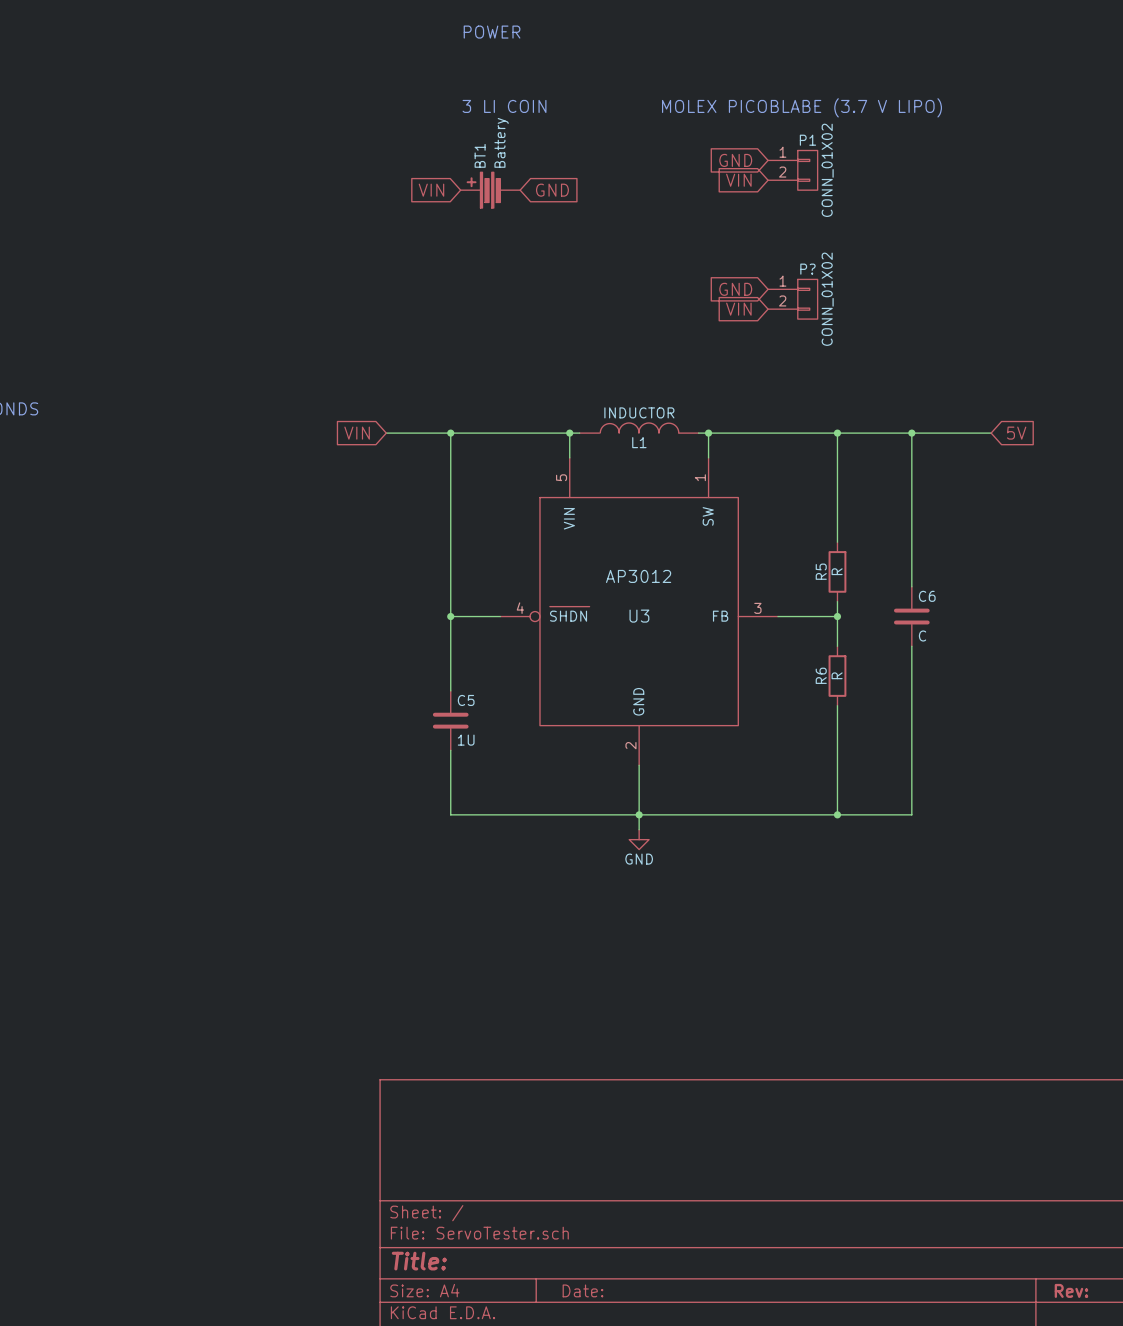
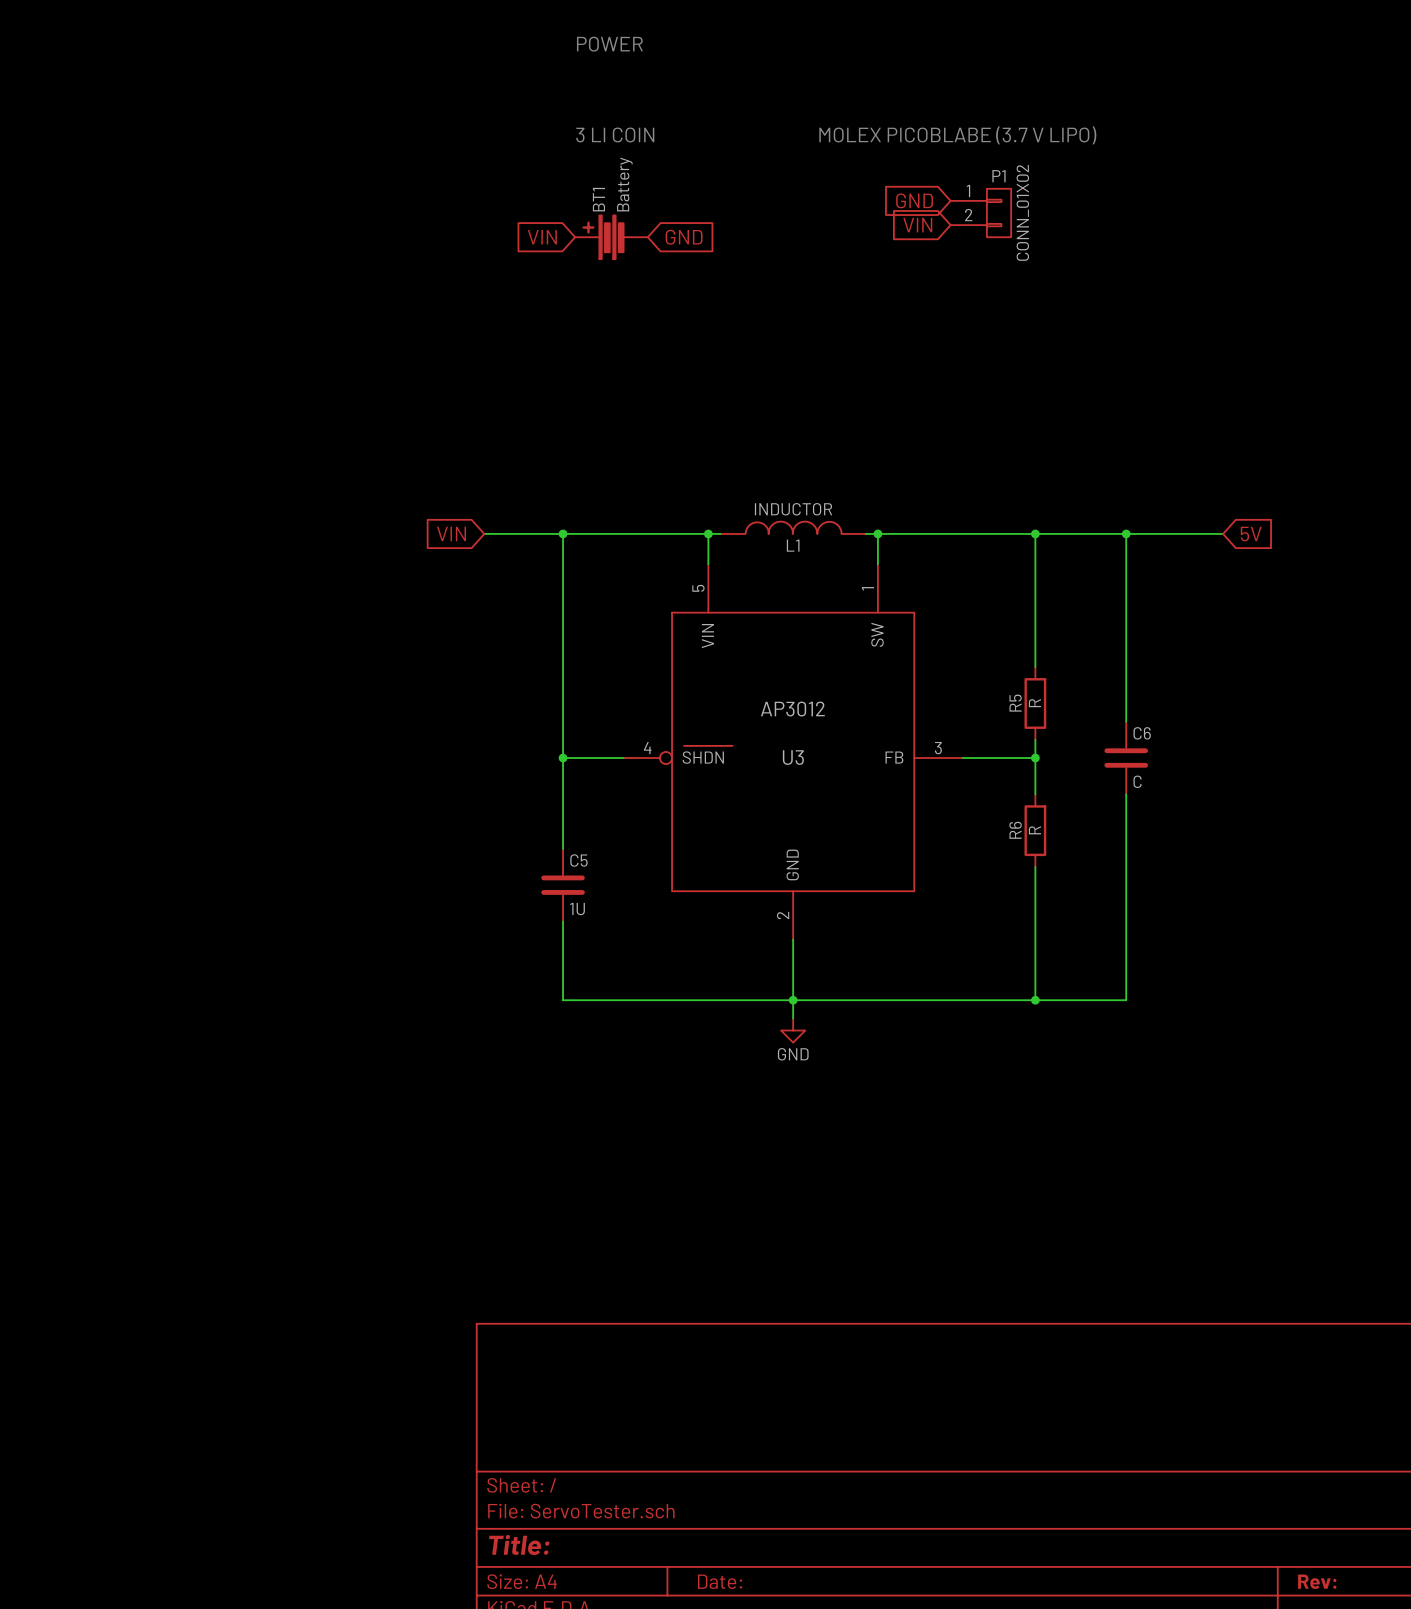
global label: GND (735, 289) -> none
P?: CONN_01X02 (792, 299) -> none
global label: VIN (738, 309) -> none

